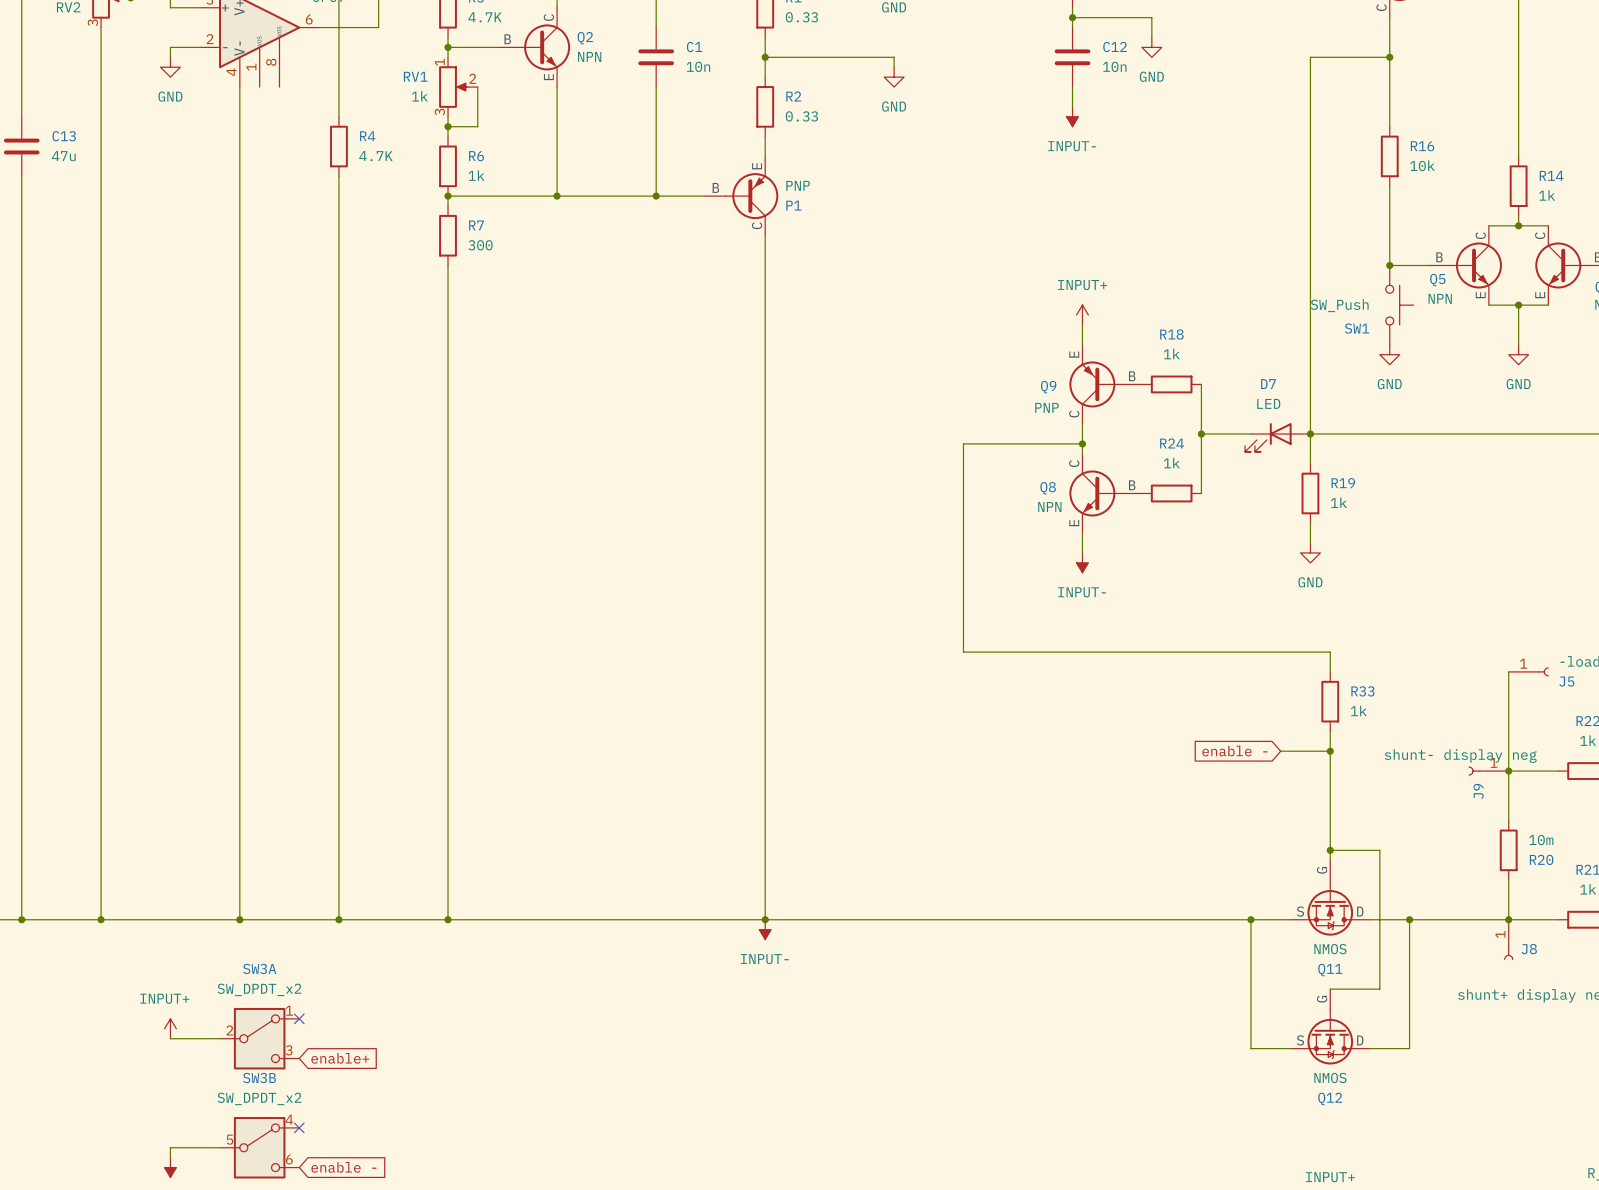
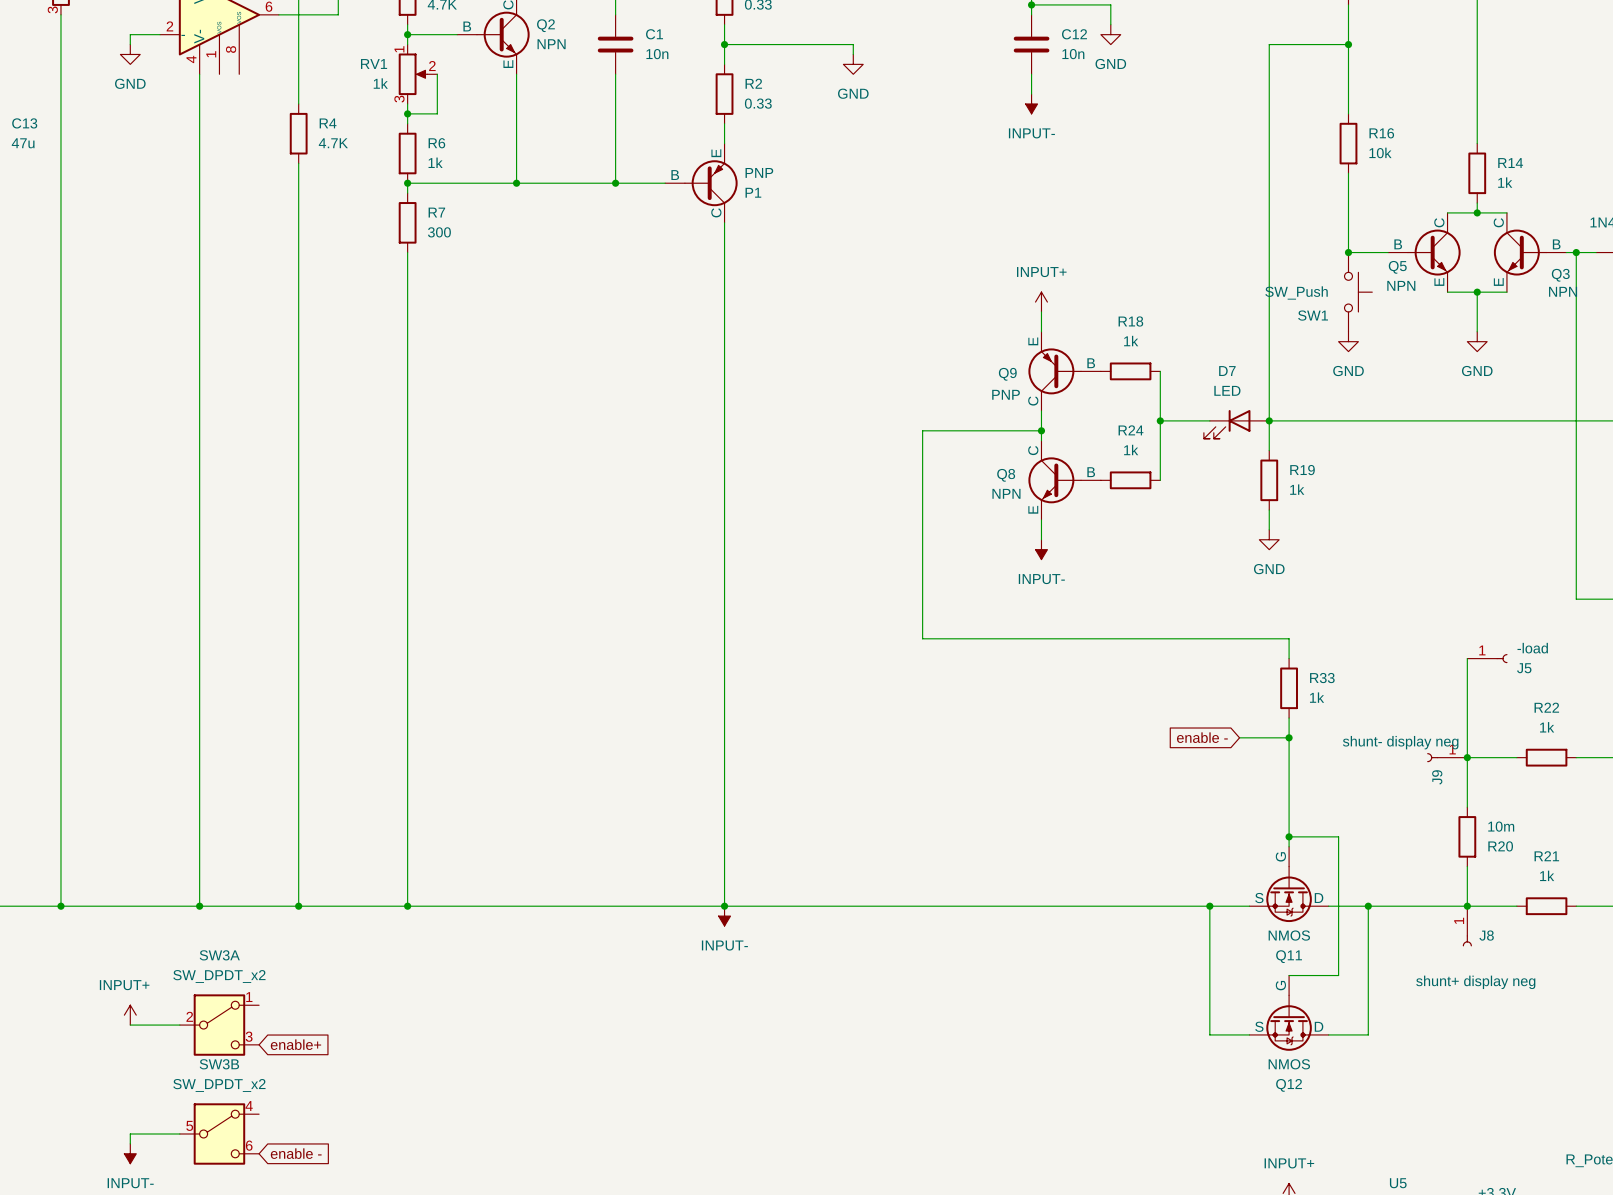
no-connect mark: (299, 1018) -> none
no-connect mark: (299, 1127) -> none

